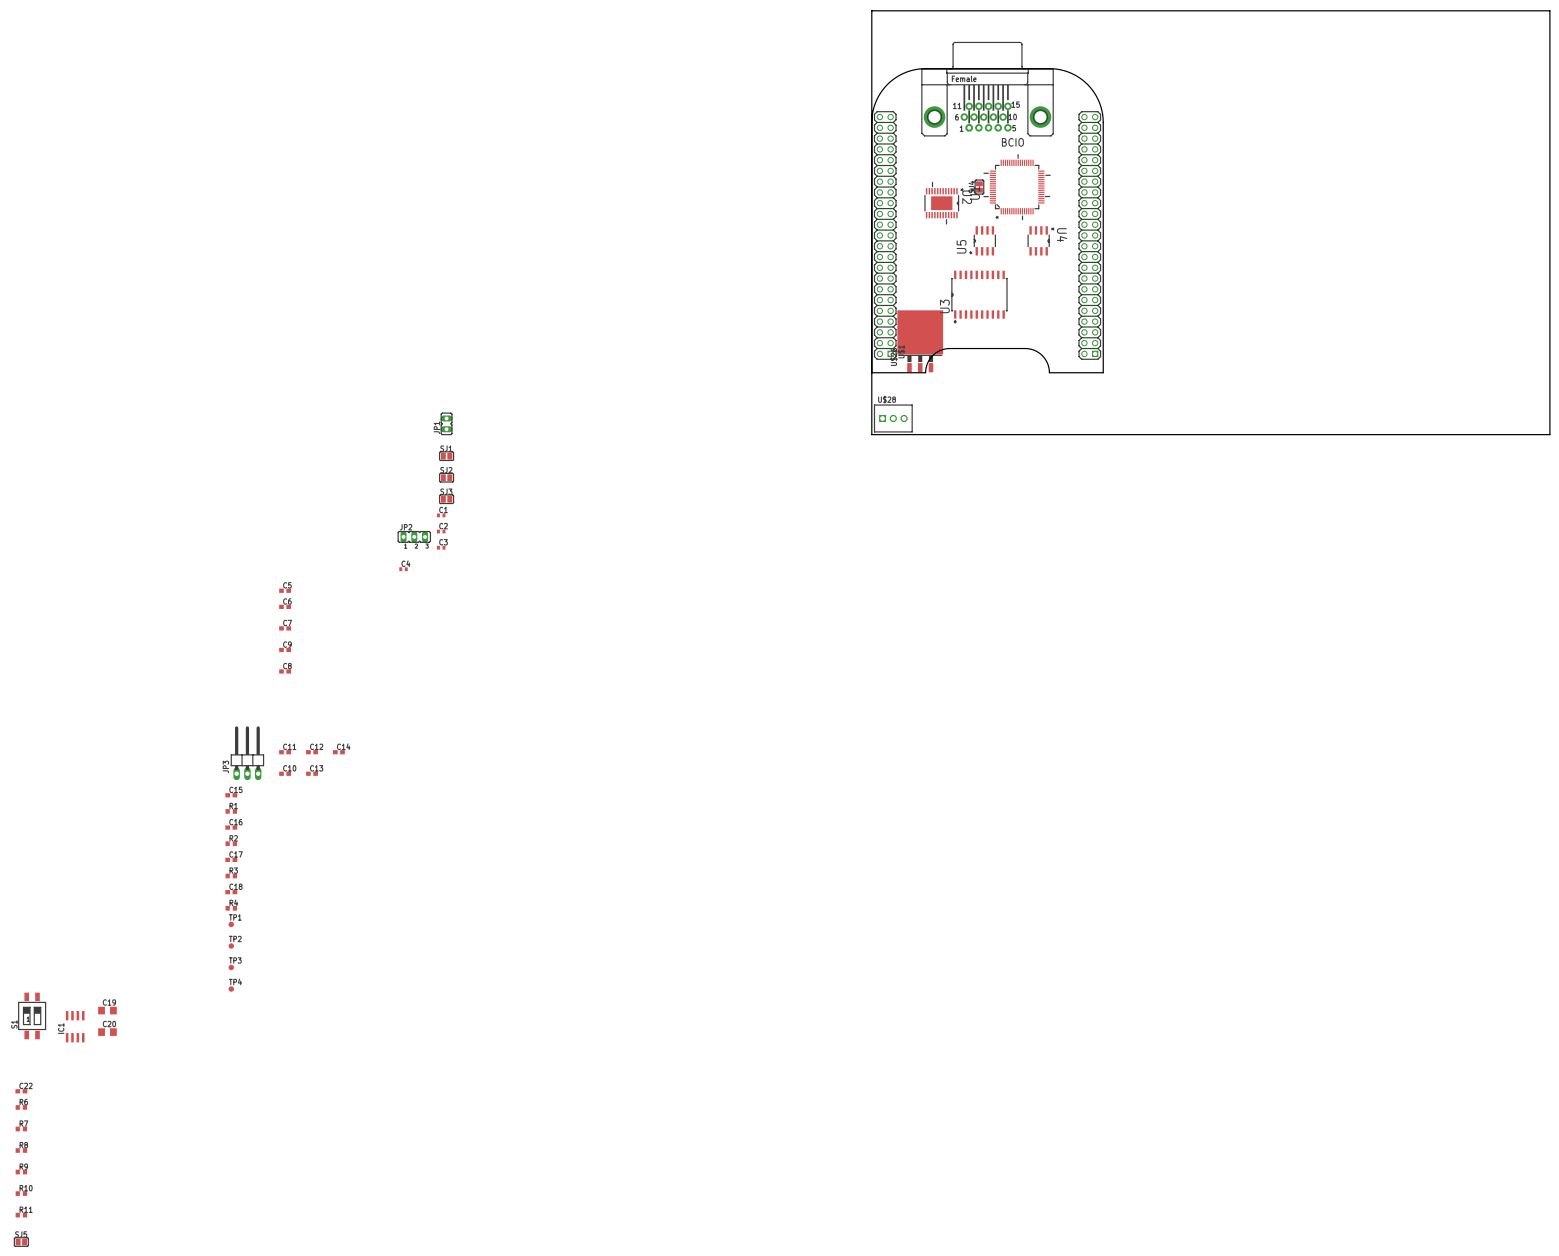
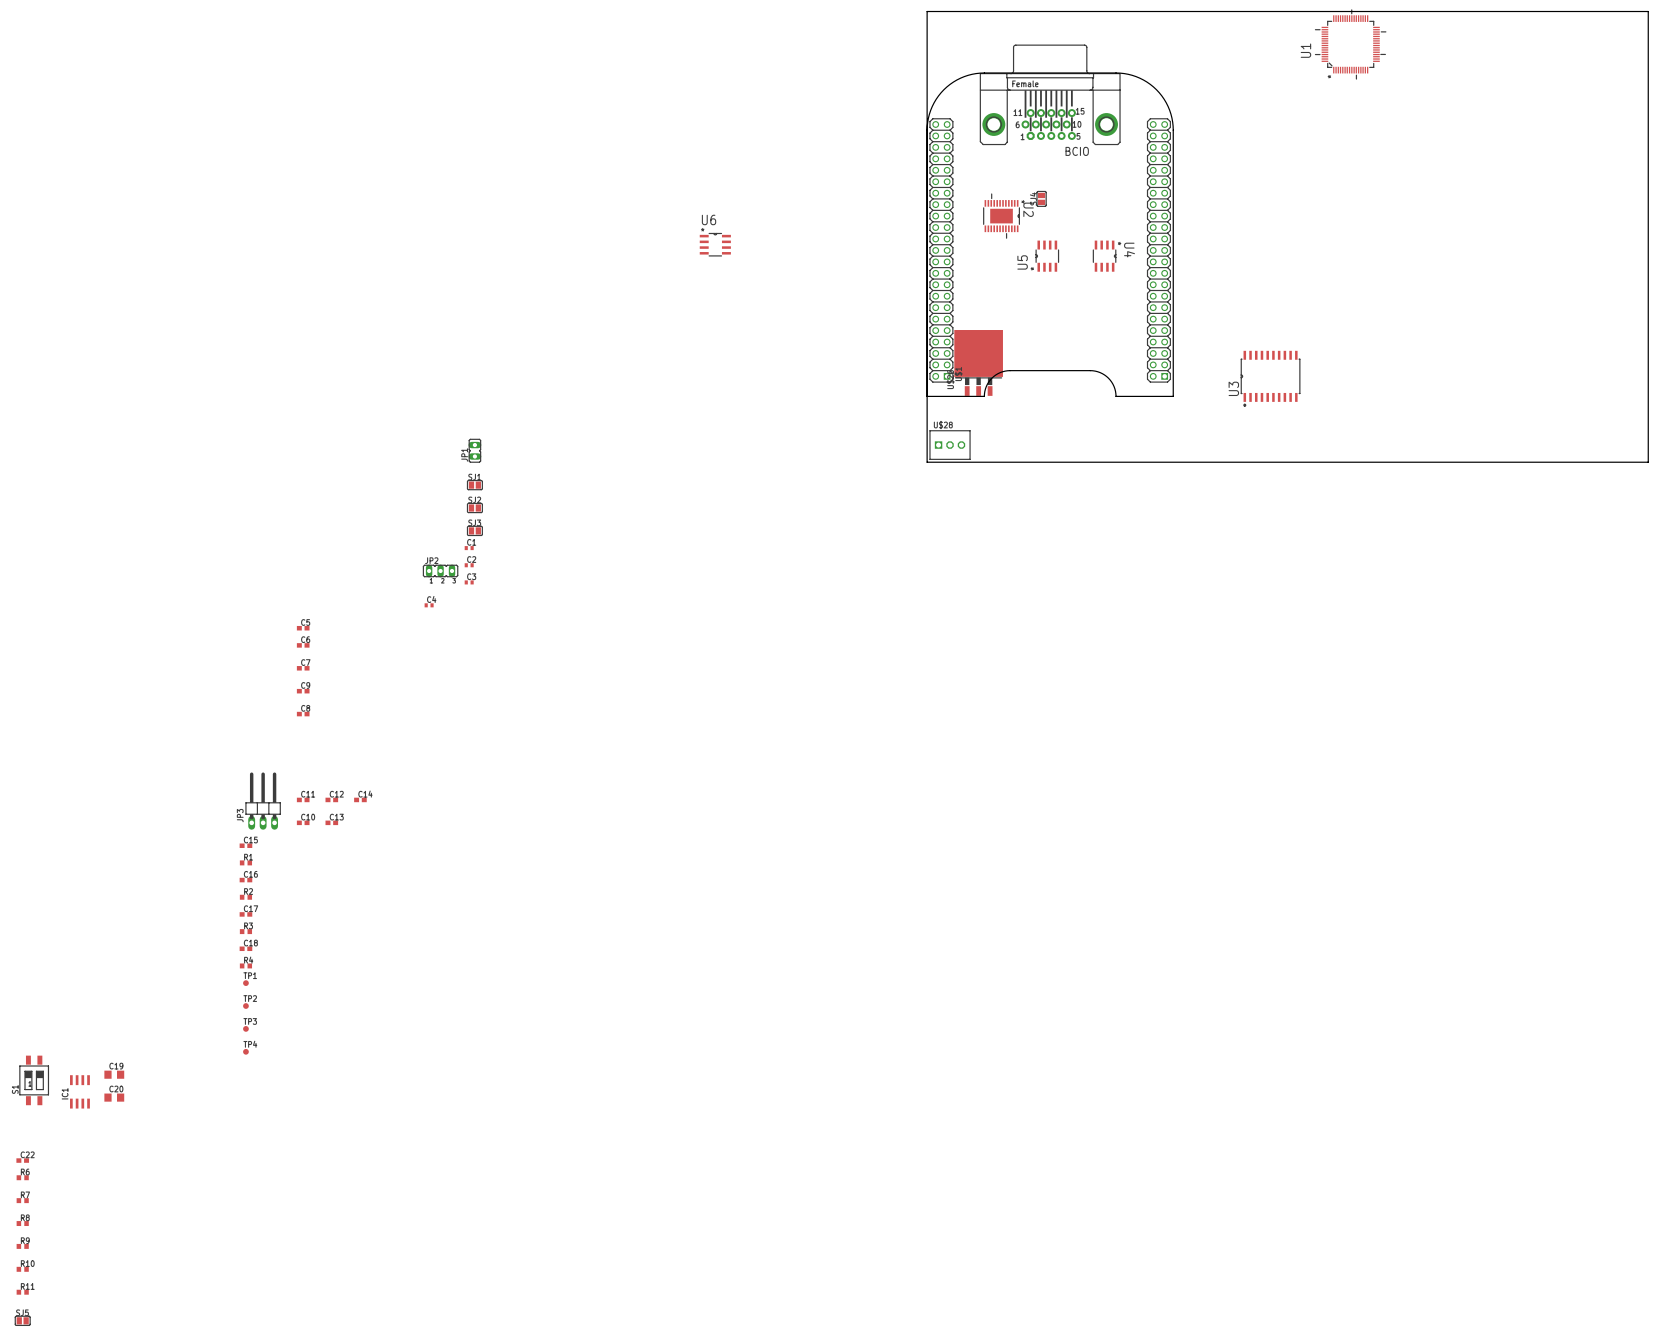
U1 position: (1017, 187) -> (1350, 44)
U6: none -> (715, 244)
U3 position: (979, 296) -> (1270, 378)

